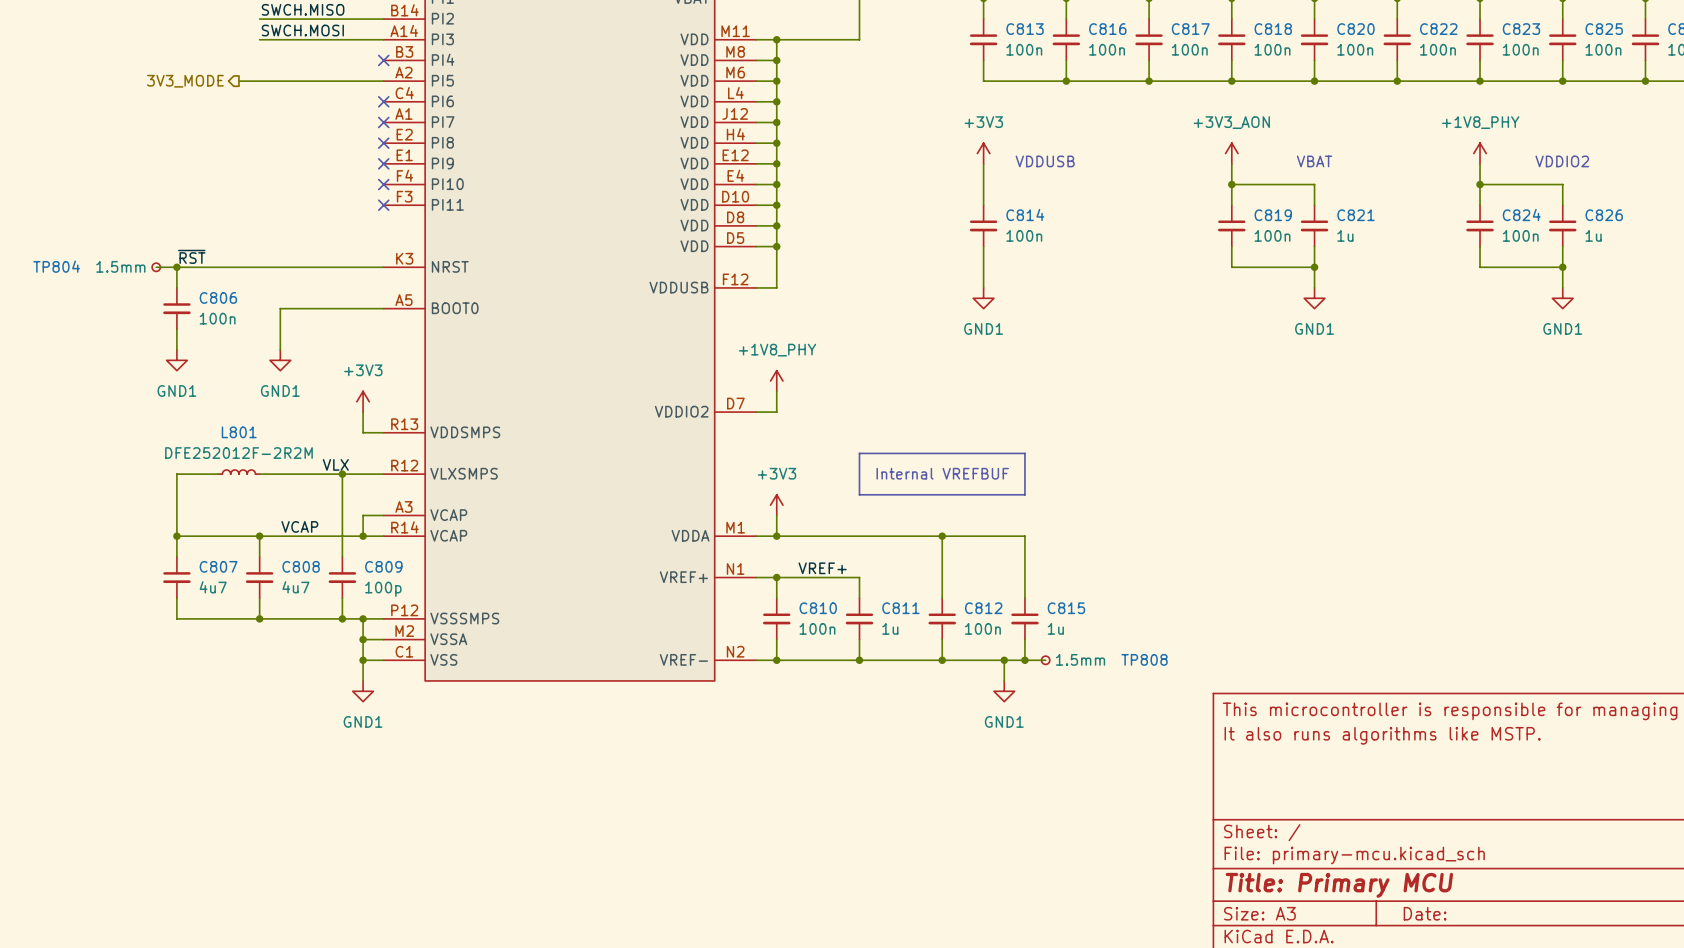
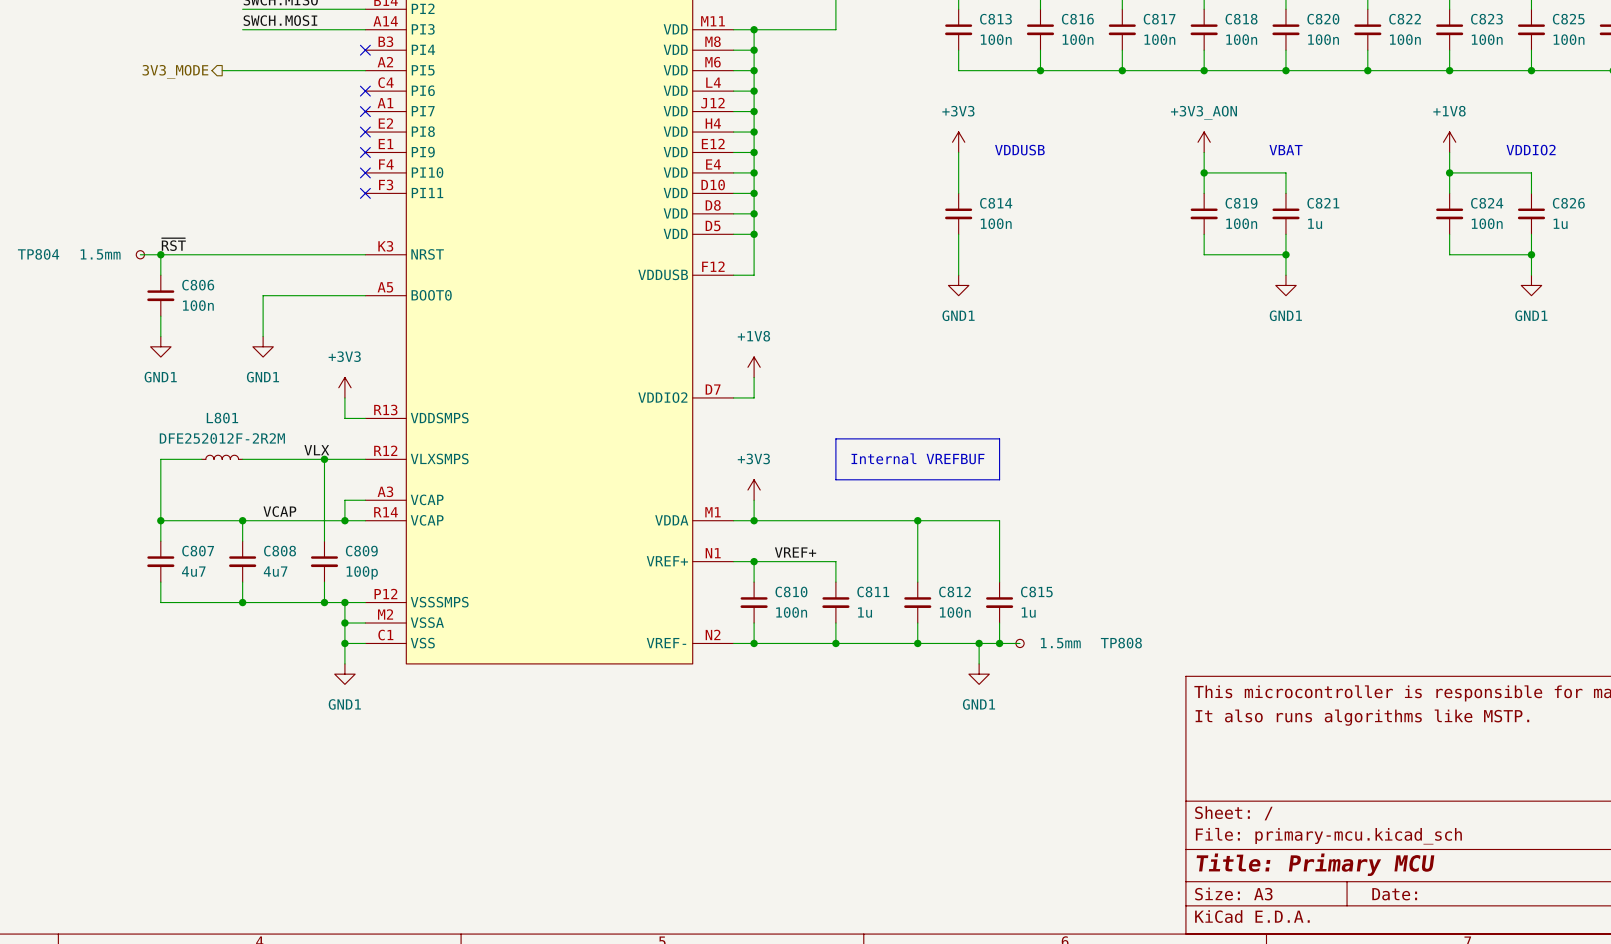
power symbol: +1V8_PHY (1480, 153) -> +1V8 (1449, 142)
power symbol: +1V8_PHY (776, 381) -> +1V8 (754, 367)

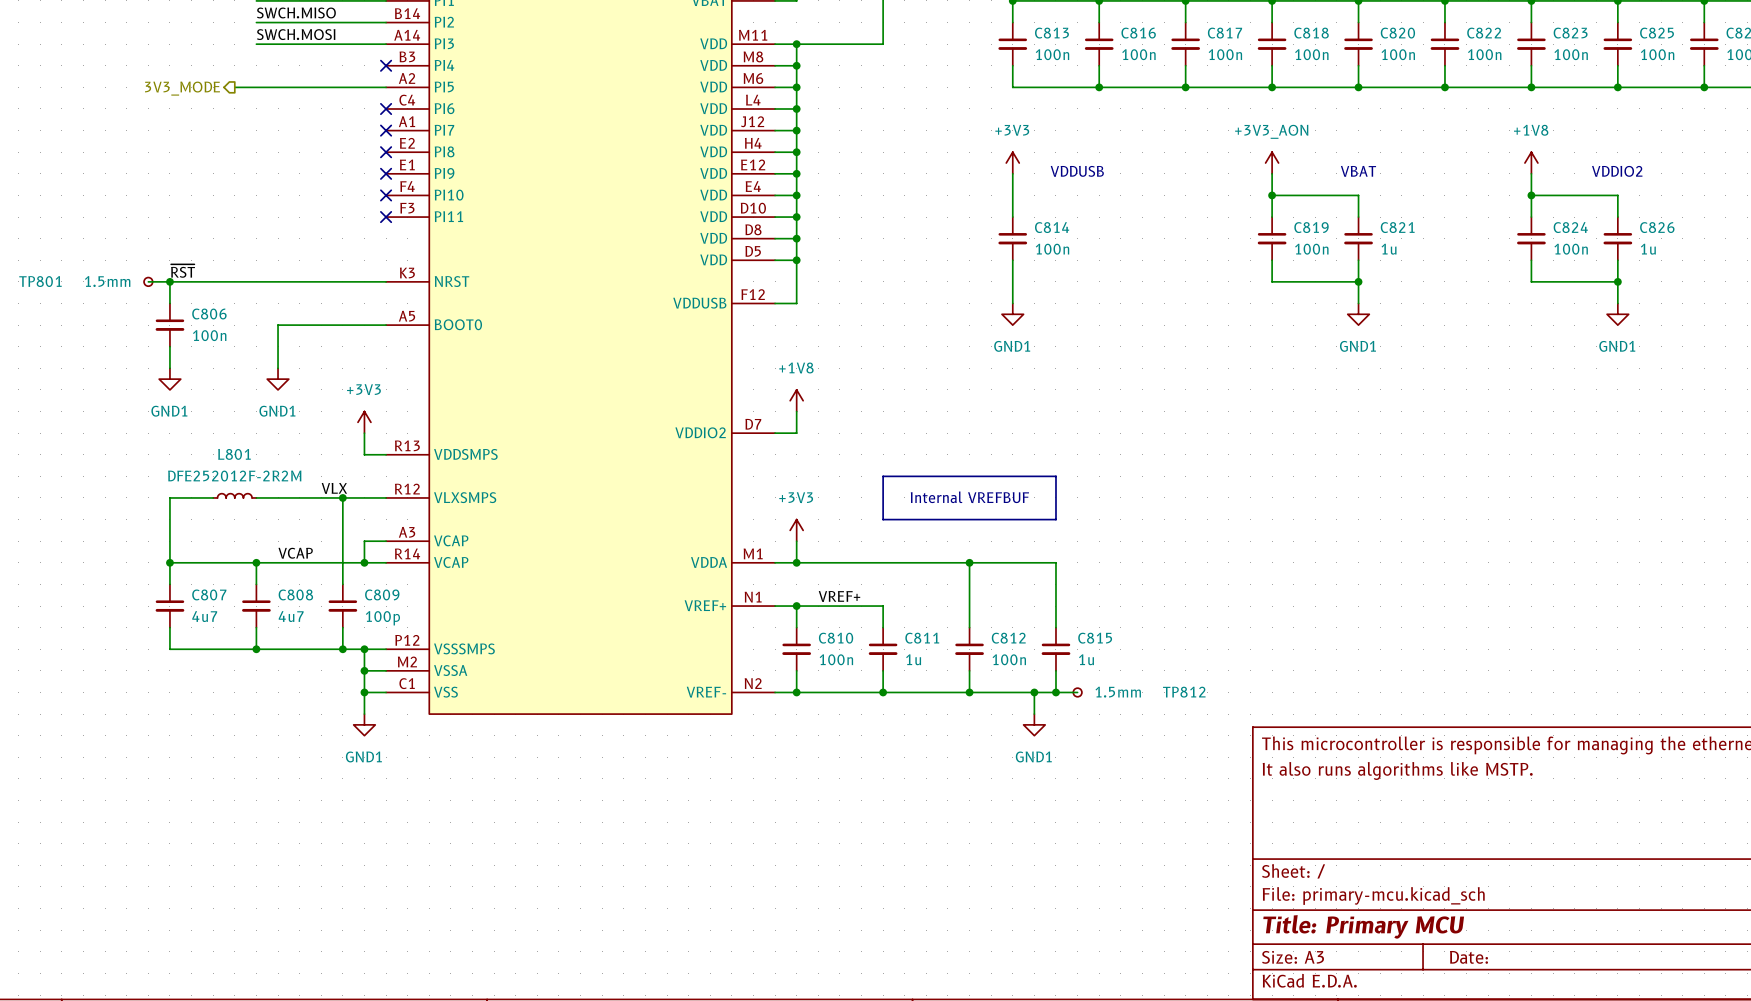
TP804 name: TP804 (38, 254) -> TP801 (40, 281)
TP808 name: TP808 (1121, 643) -> TP812 (1184, 692)

